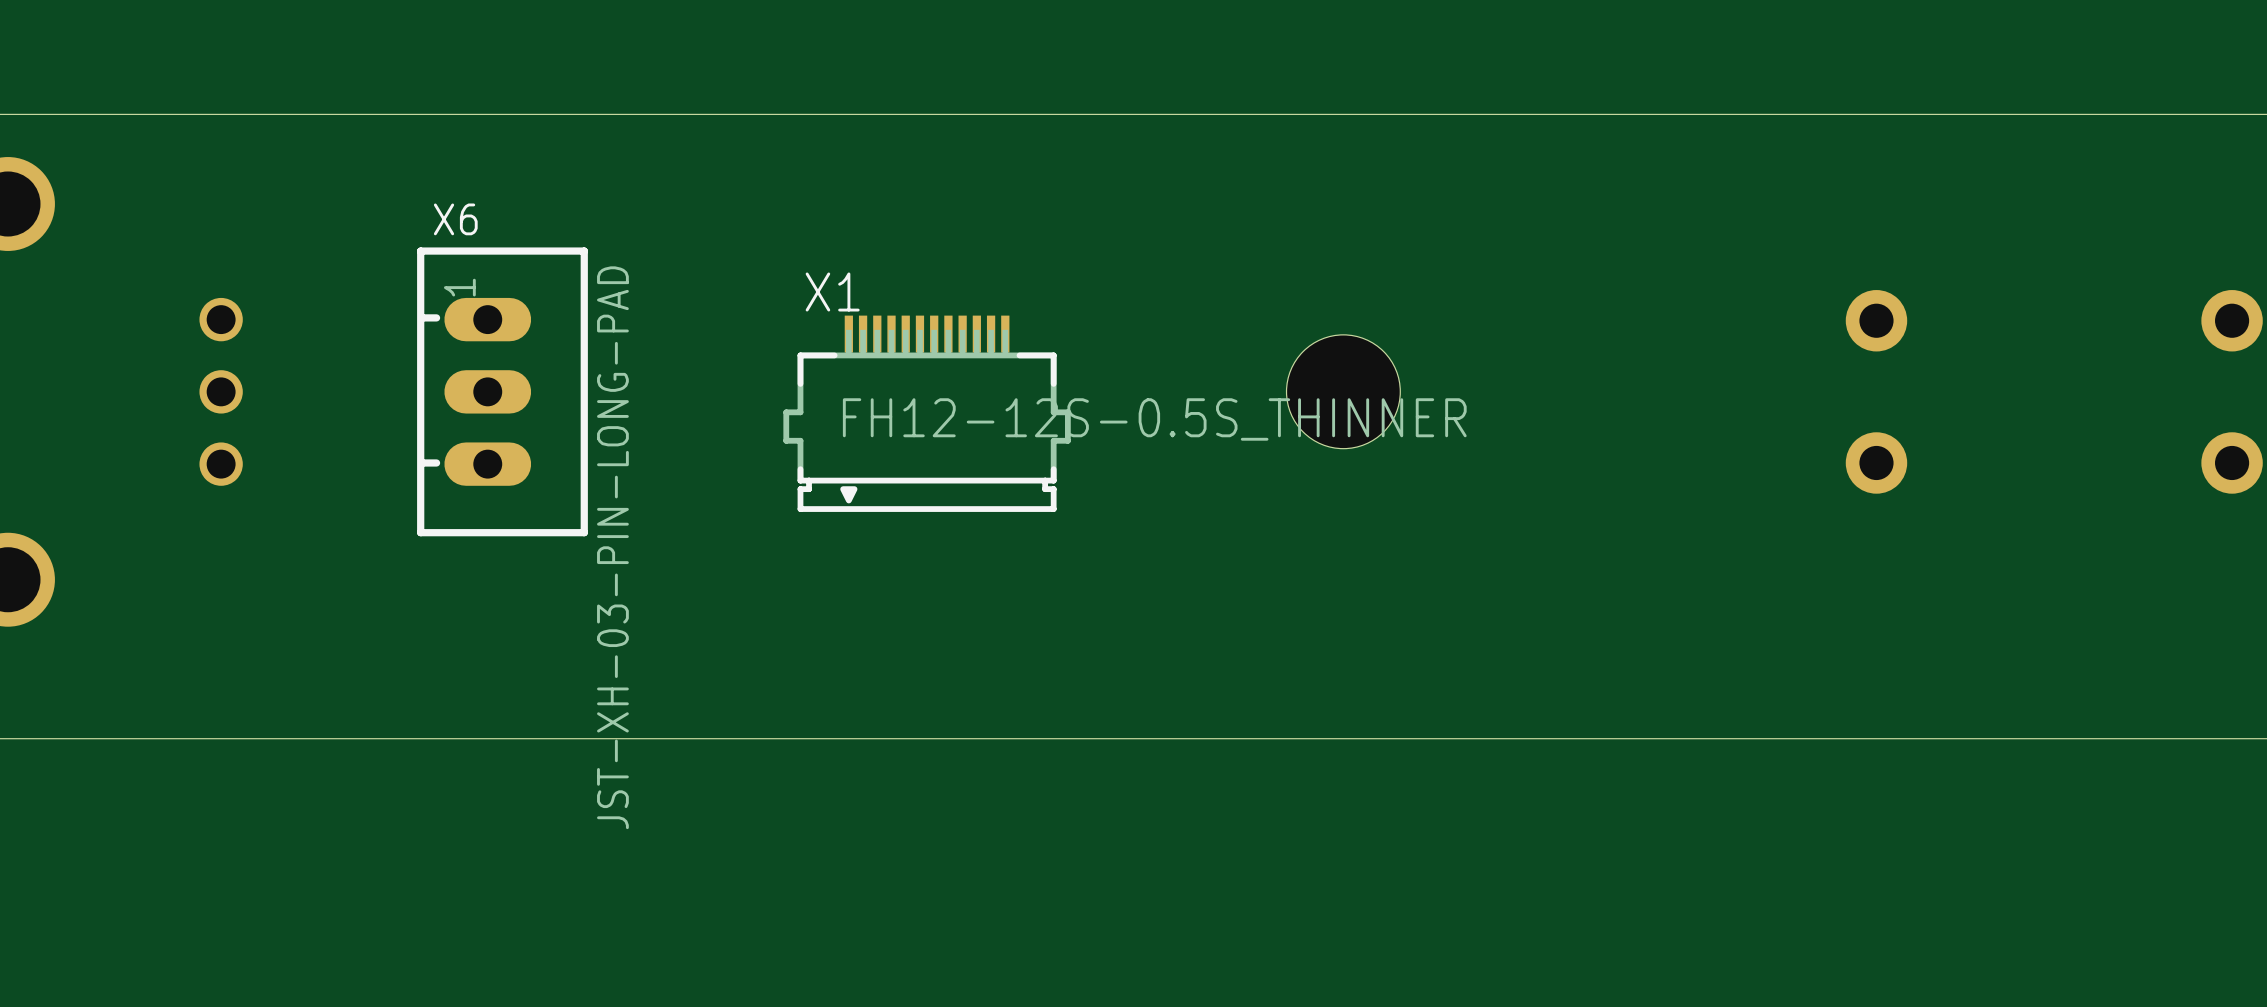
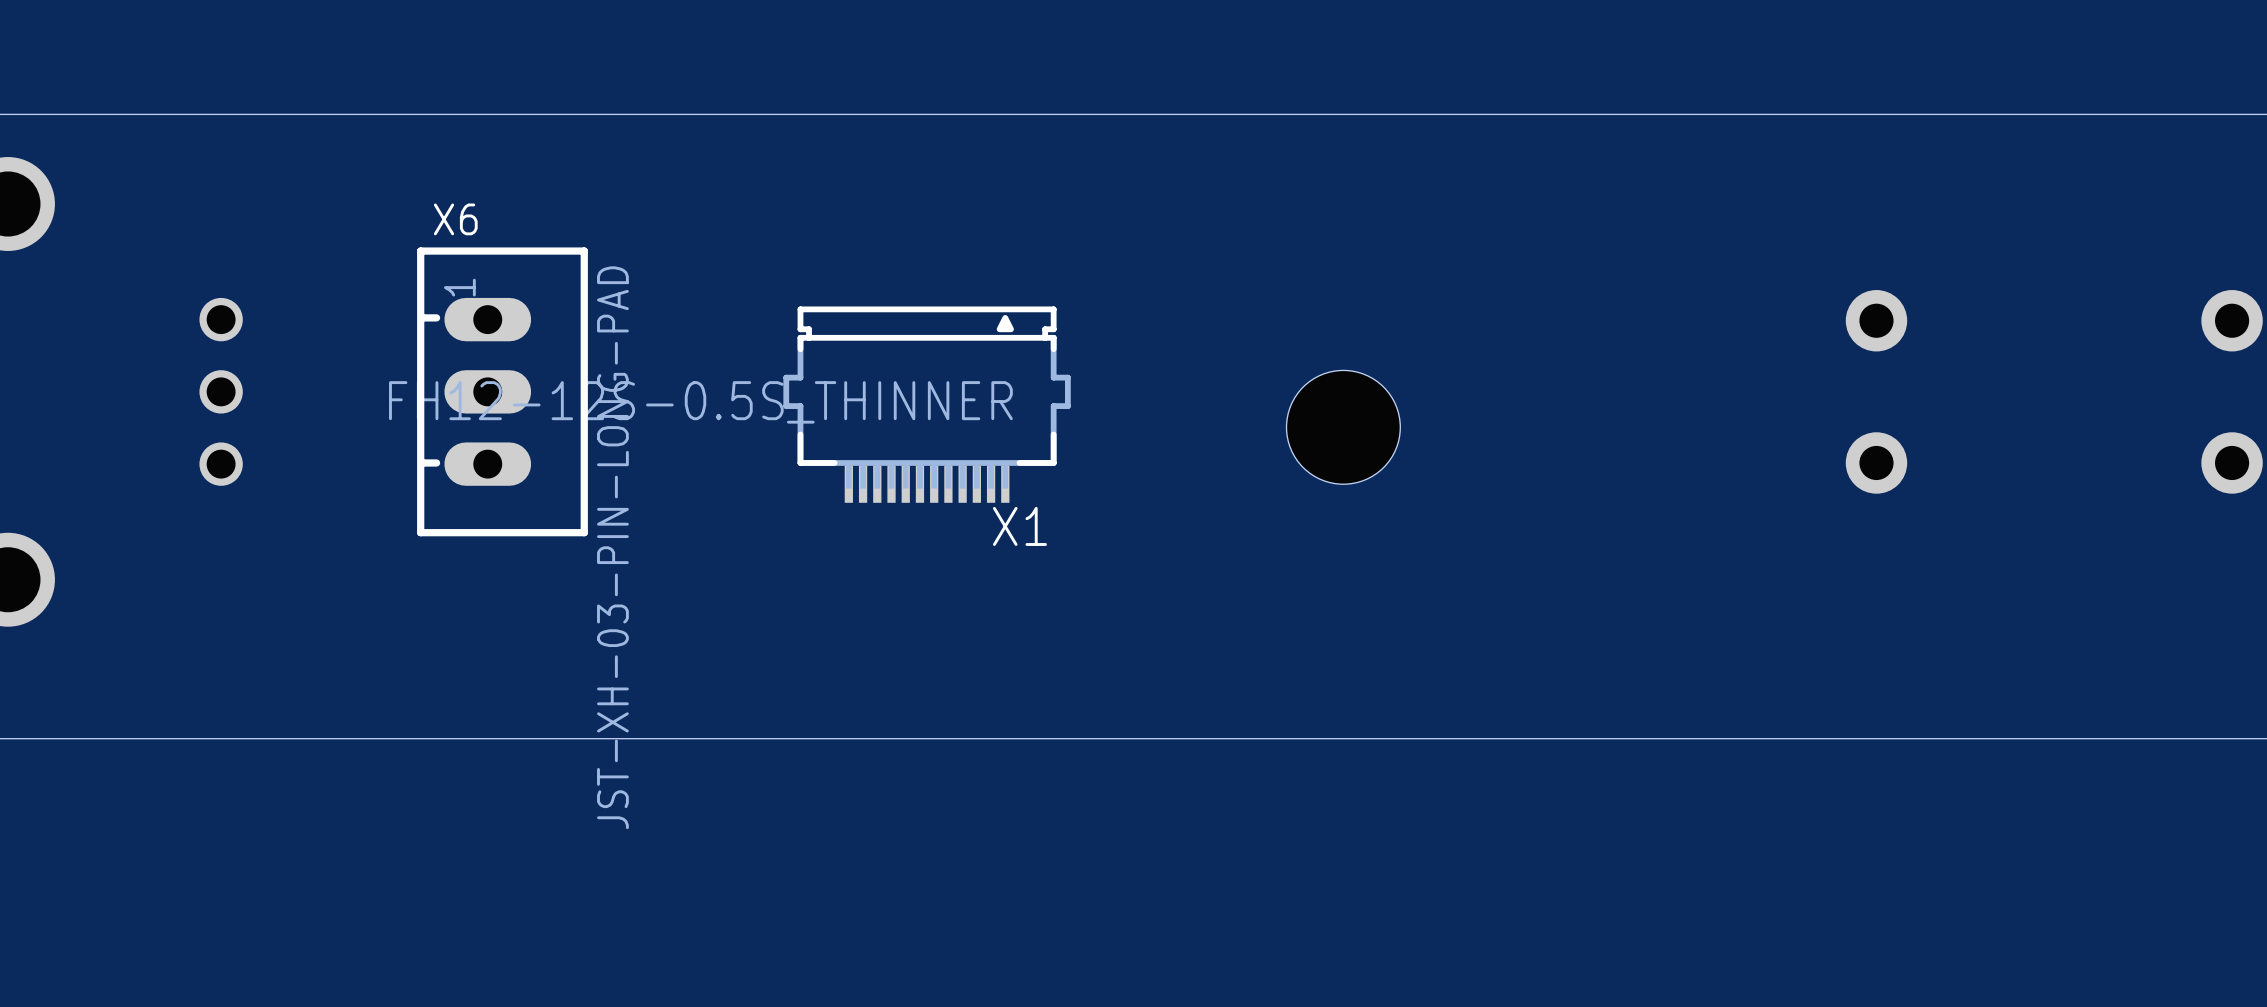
hole position: (1343, 391) -> (1343, 427)
X1 rotation: 0° (927, 413) -> 180° (927, 404)

